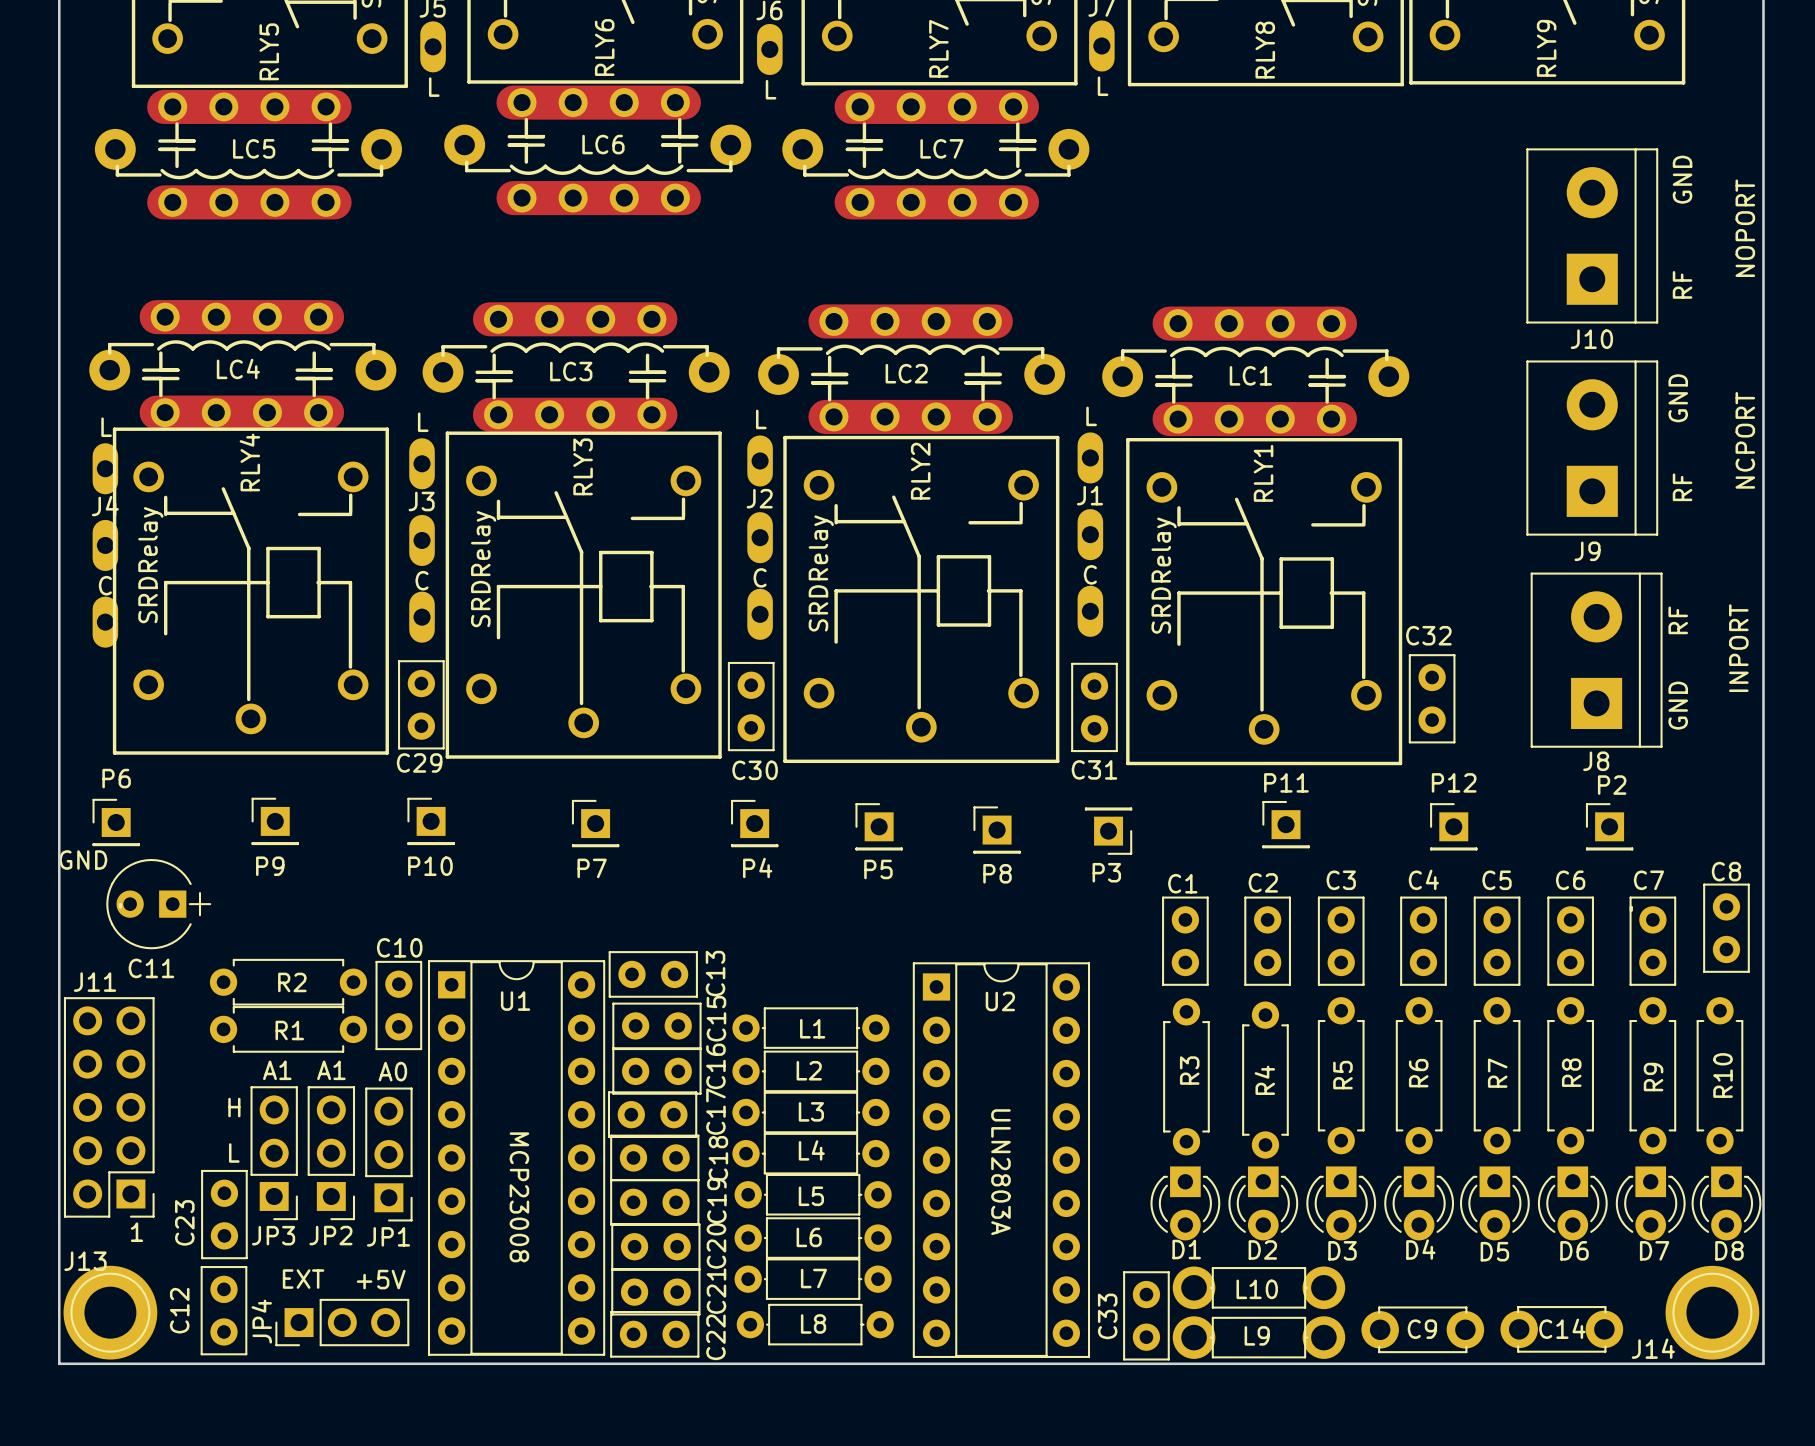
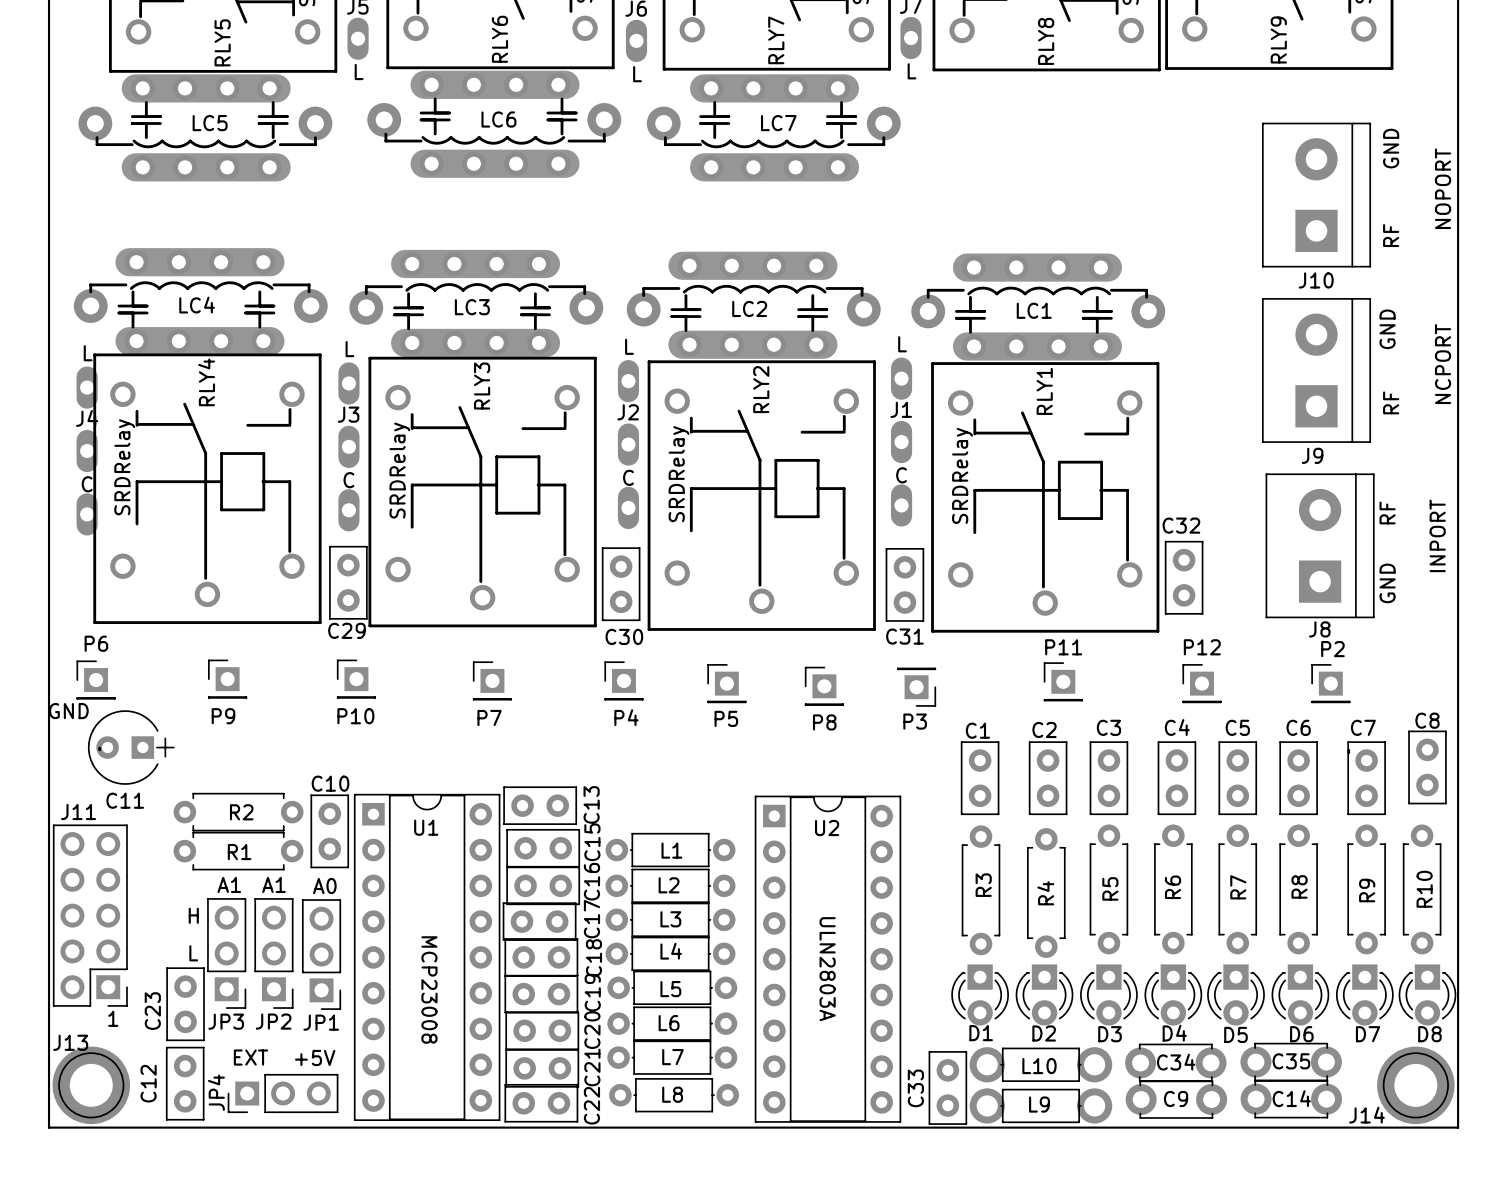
C35: none -> (1291, 1062)
C34: none -> (1175, 1062)

